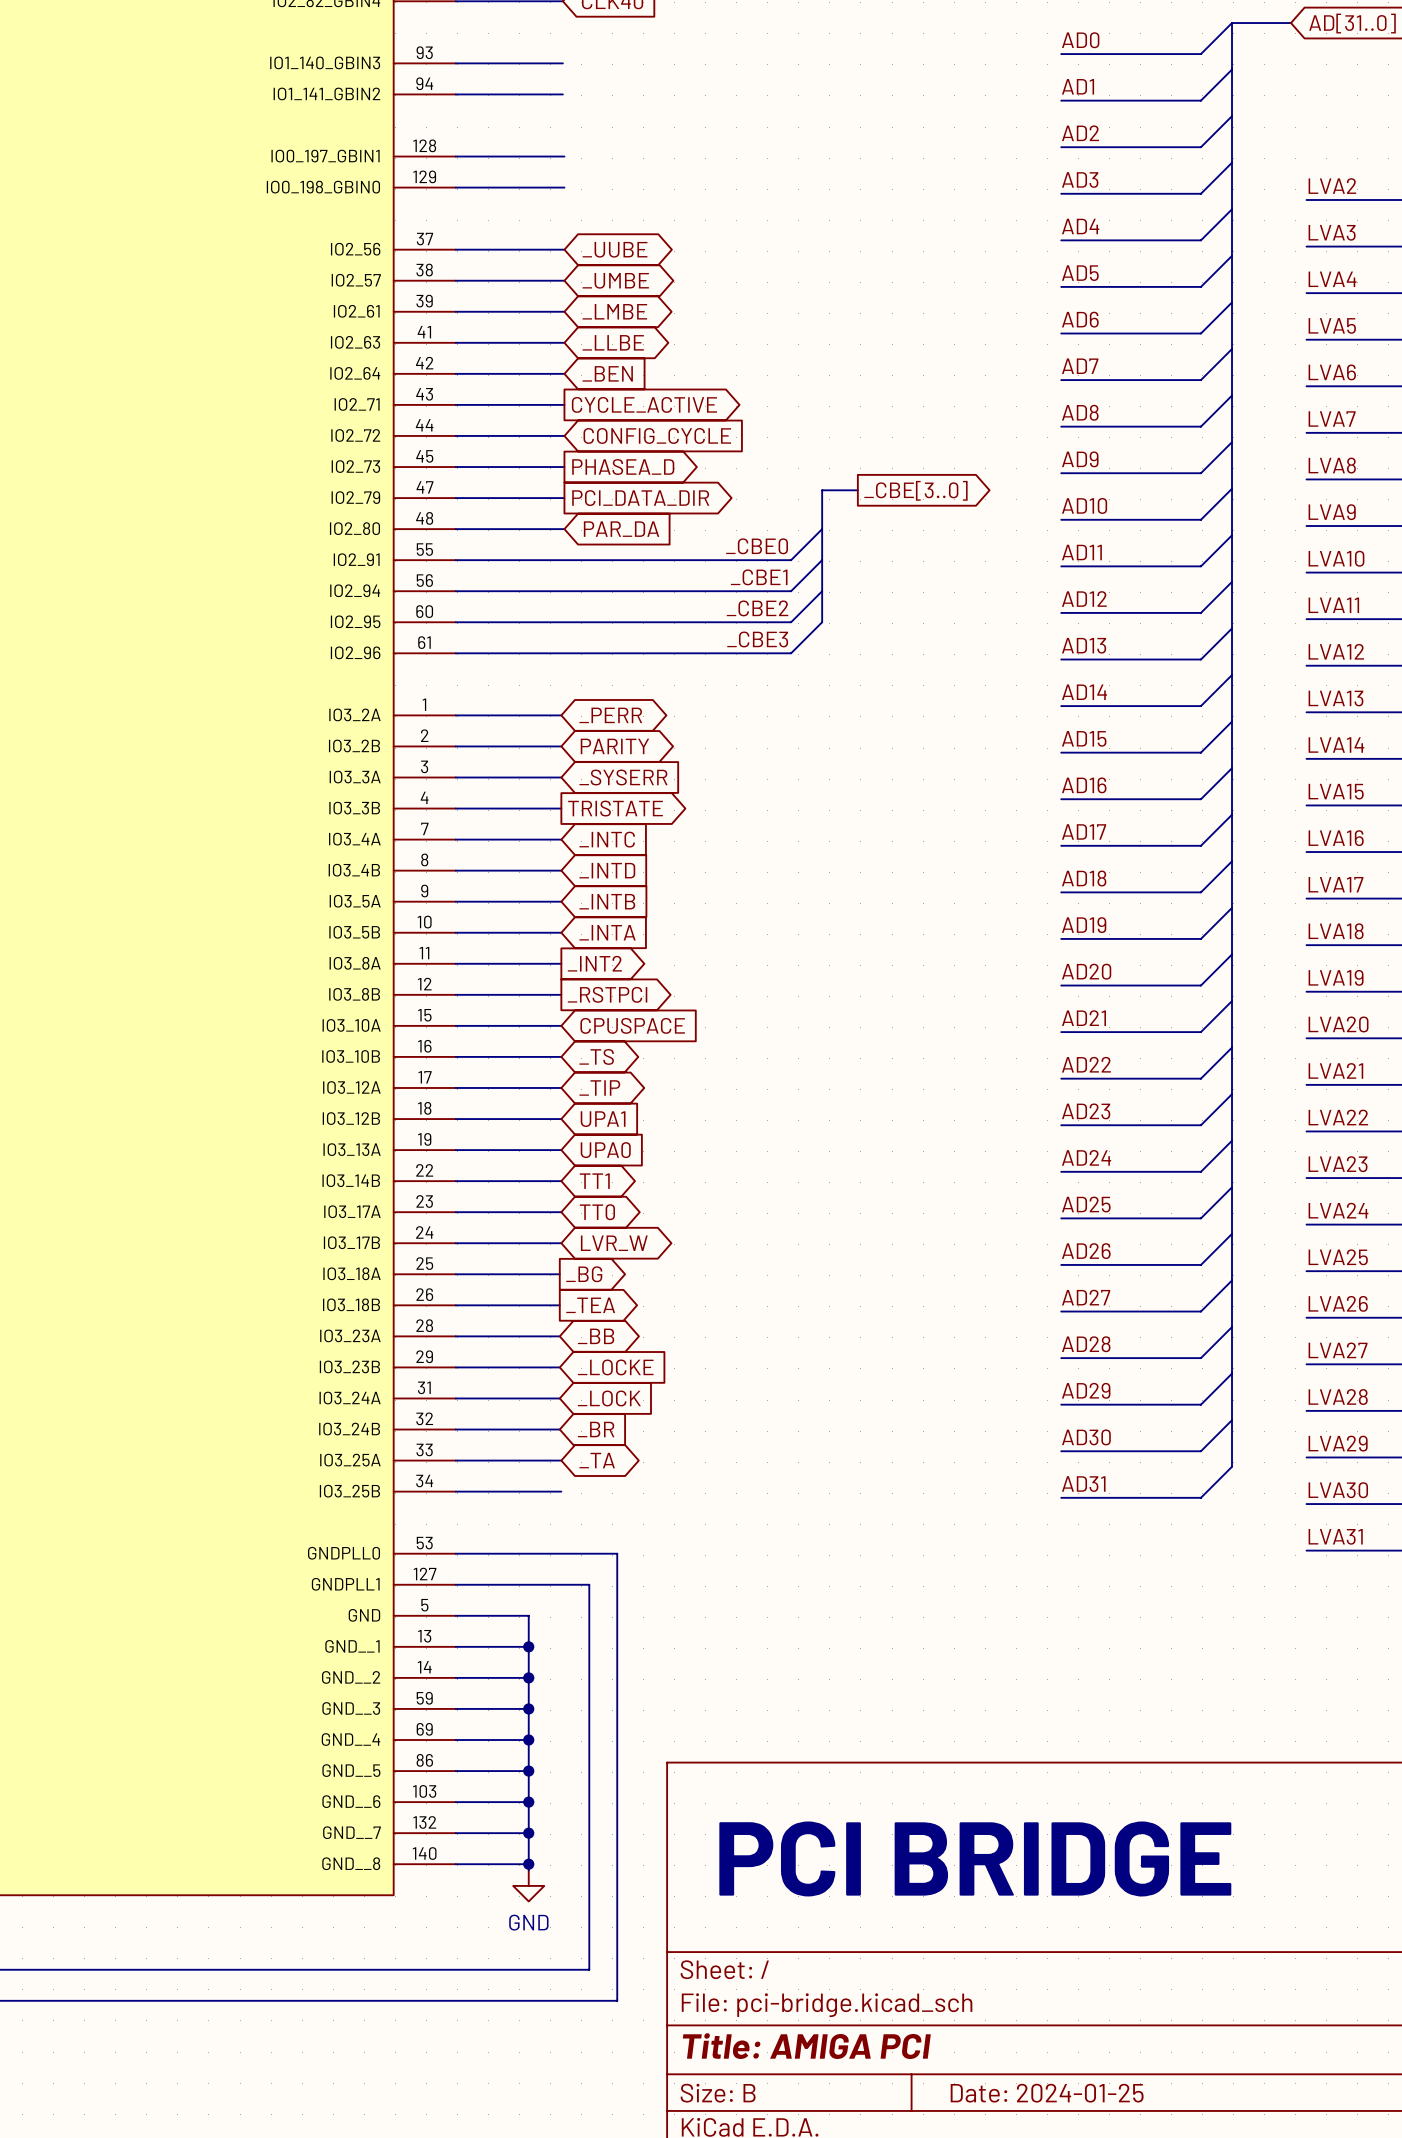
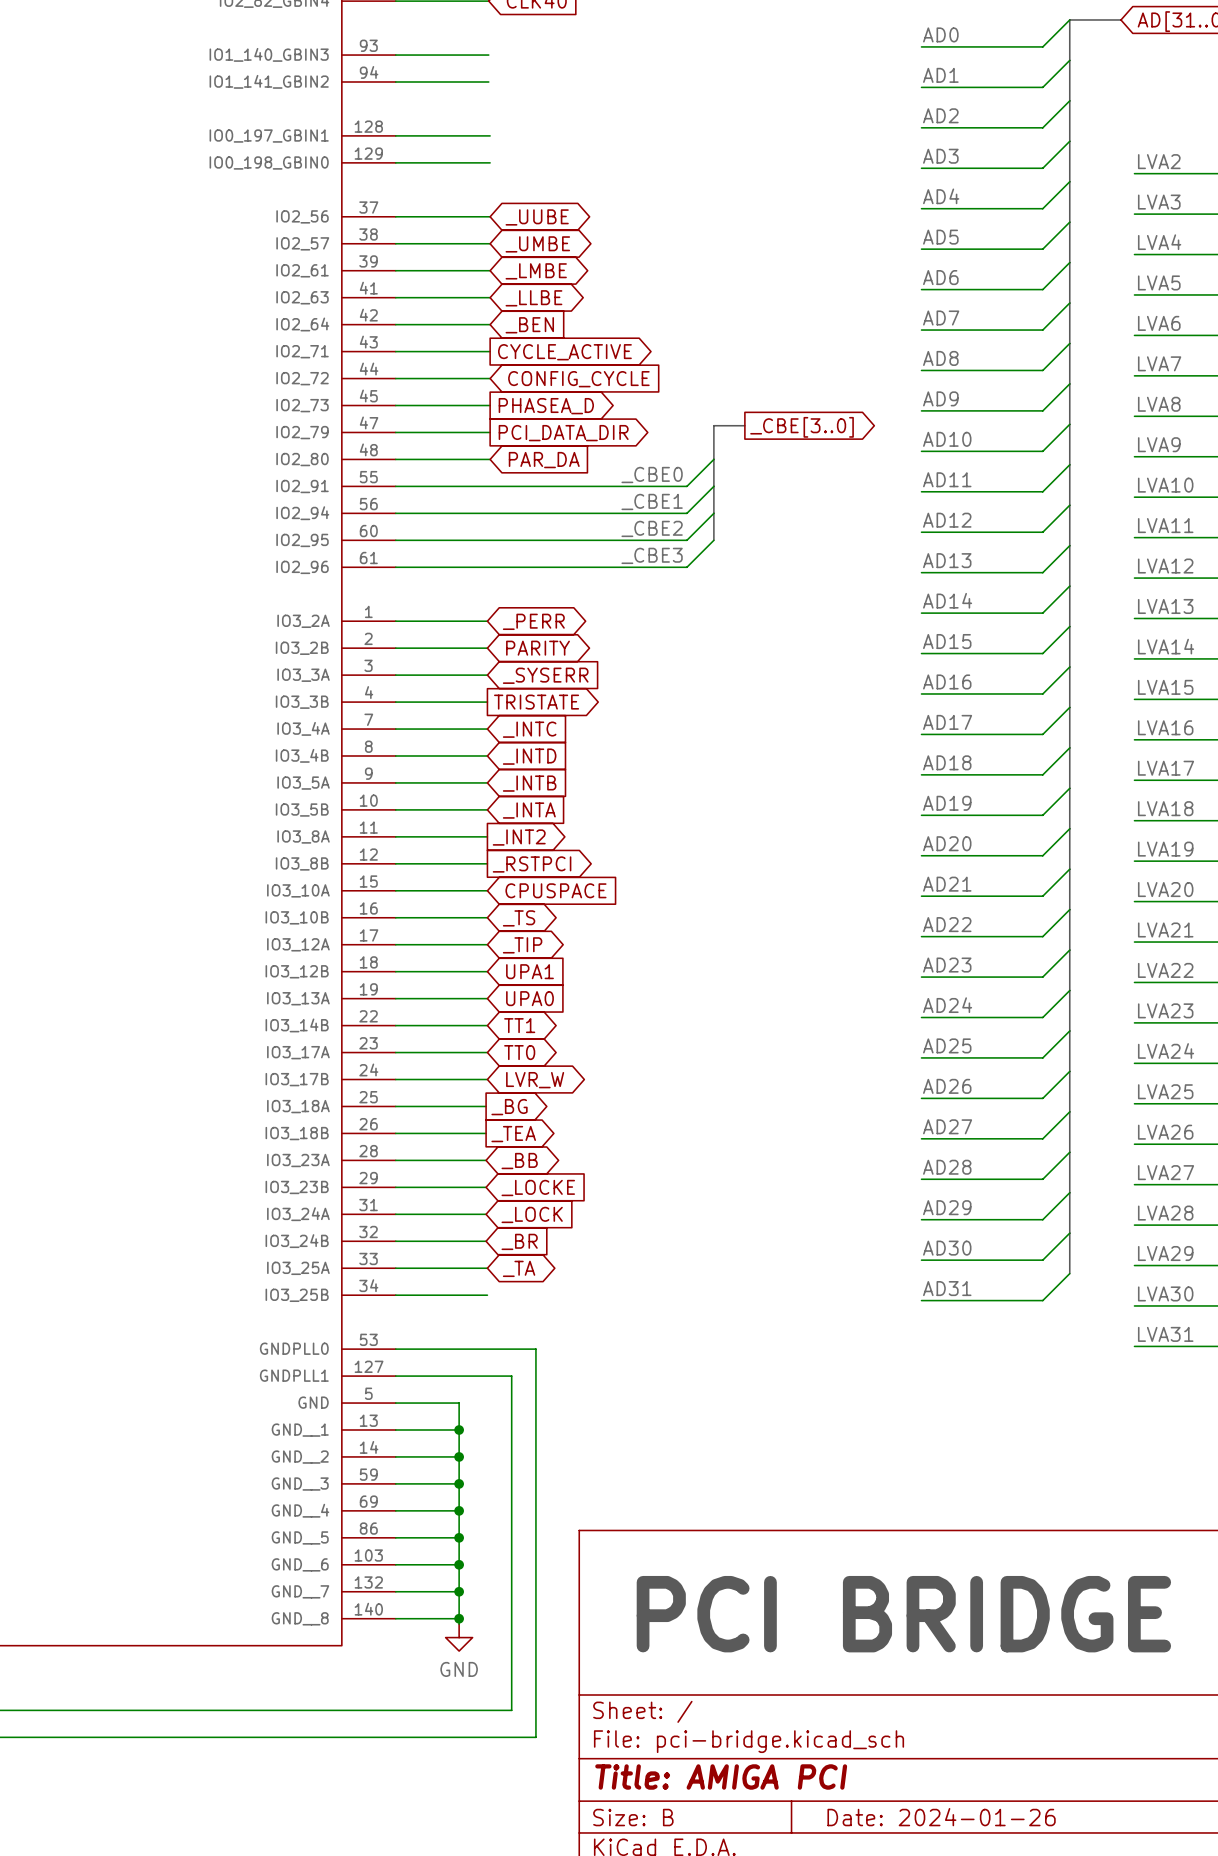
title block: Date: 2024-01-25 (1047, 2093) -> Date: 2024-01-26 (941, 1817)

